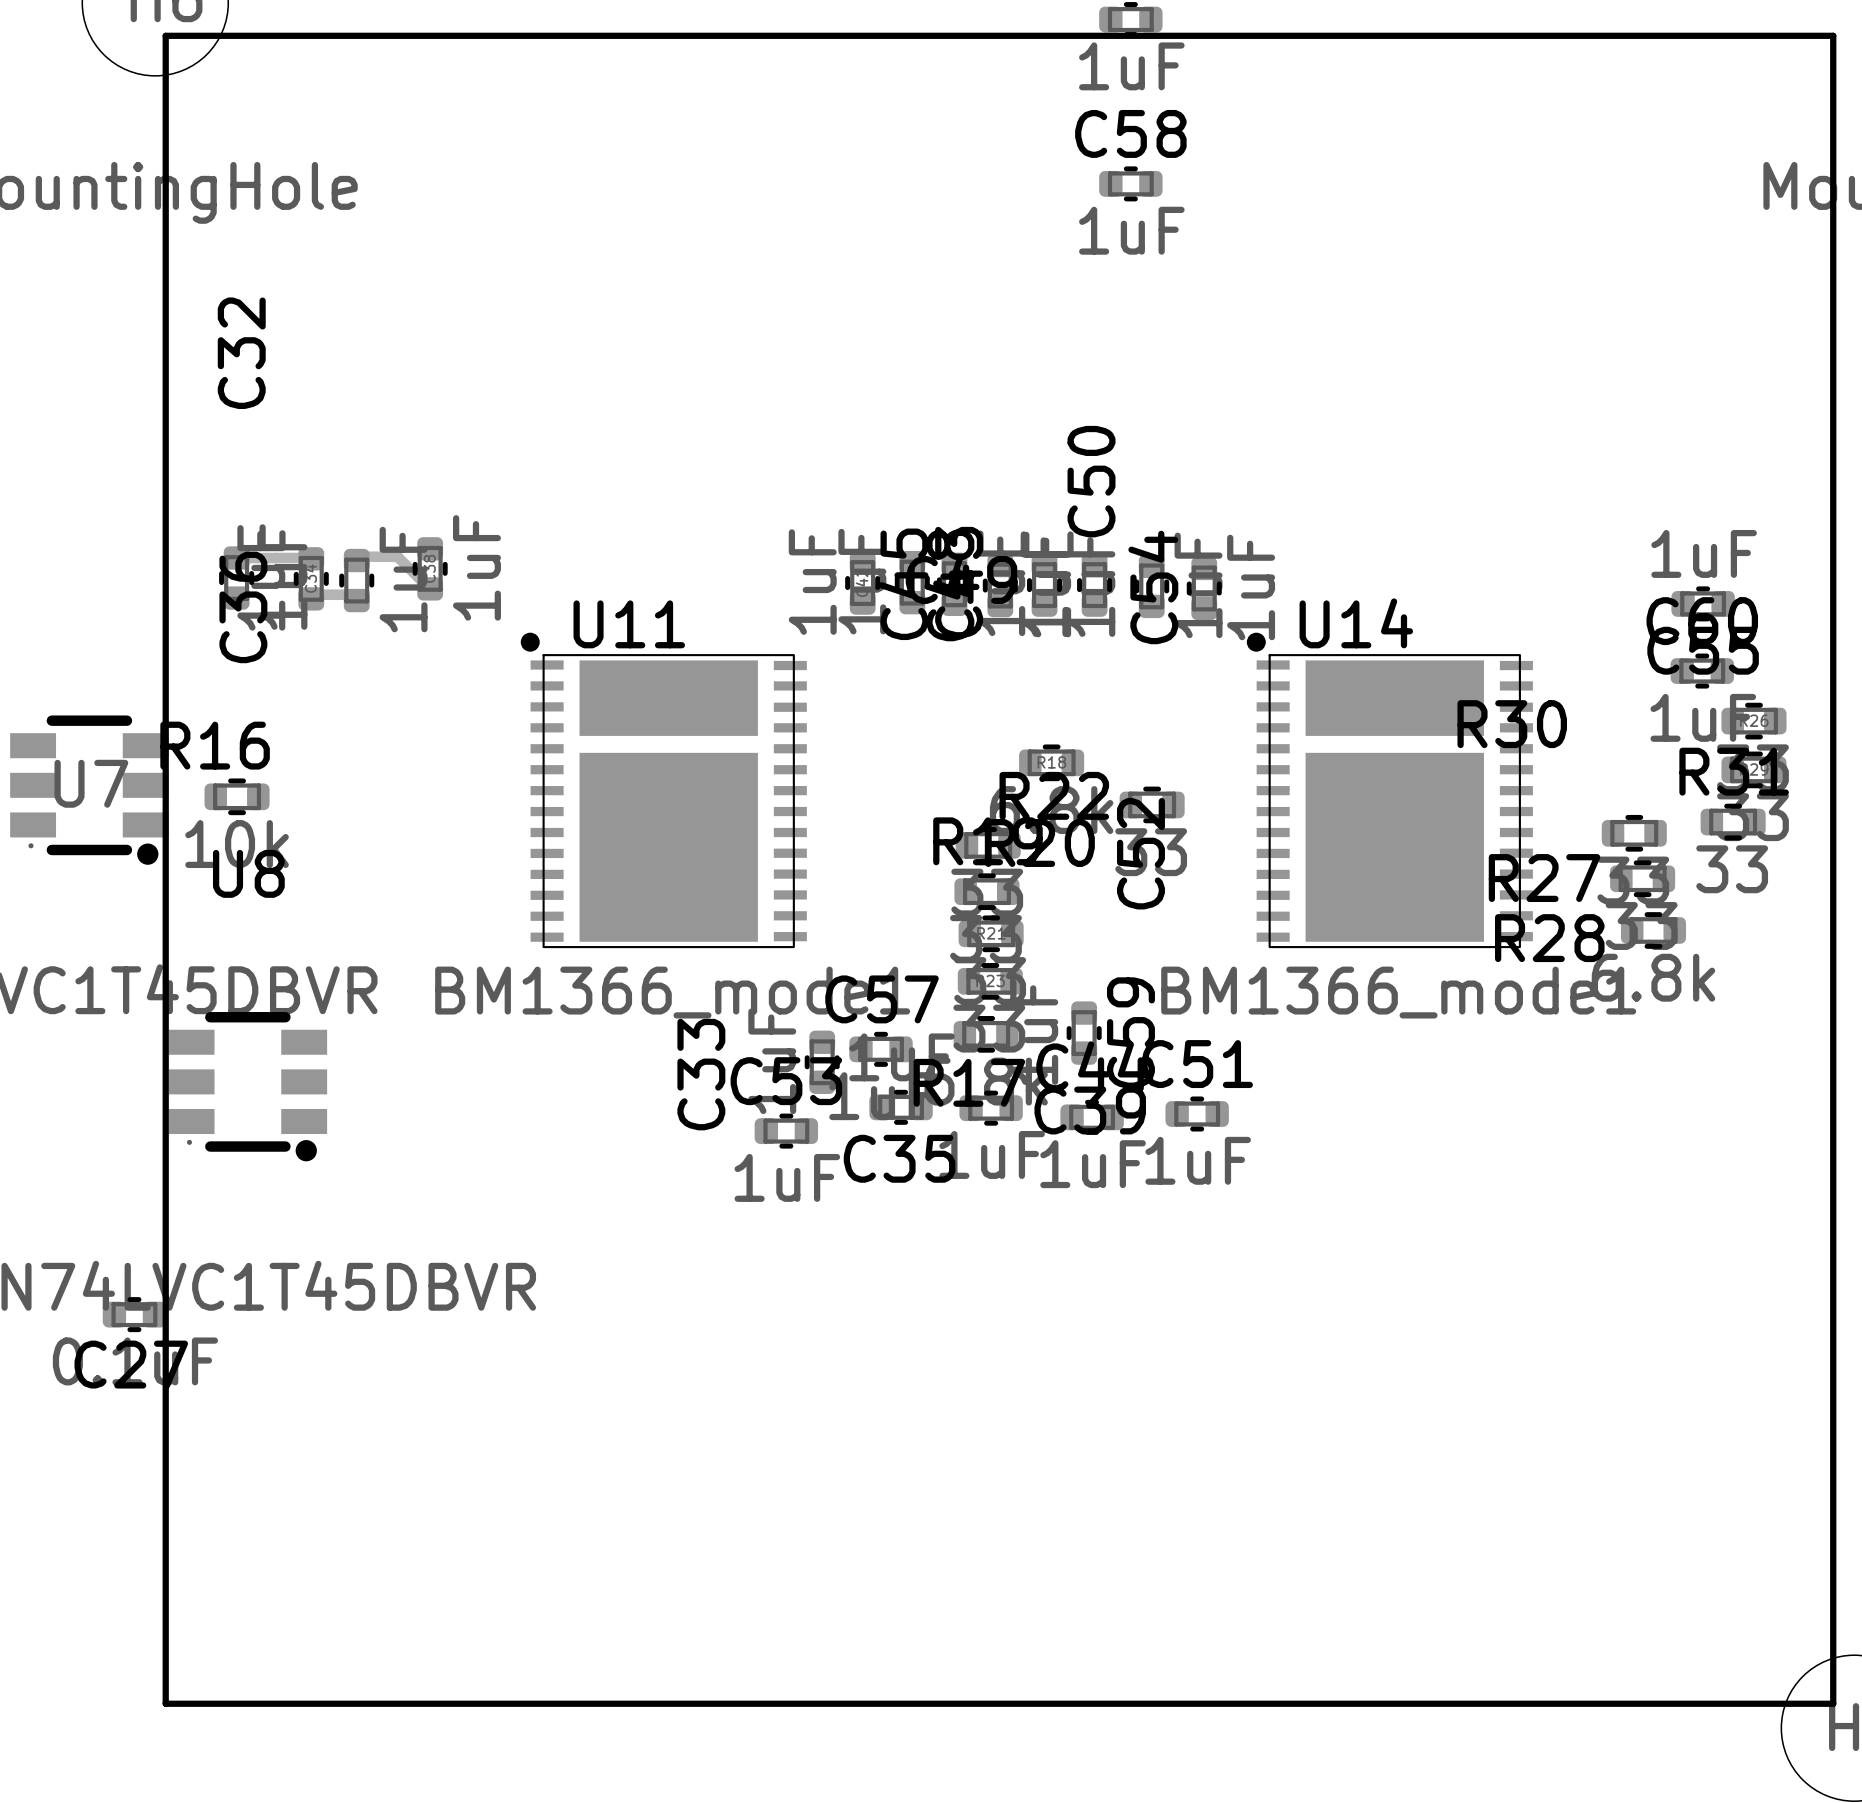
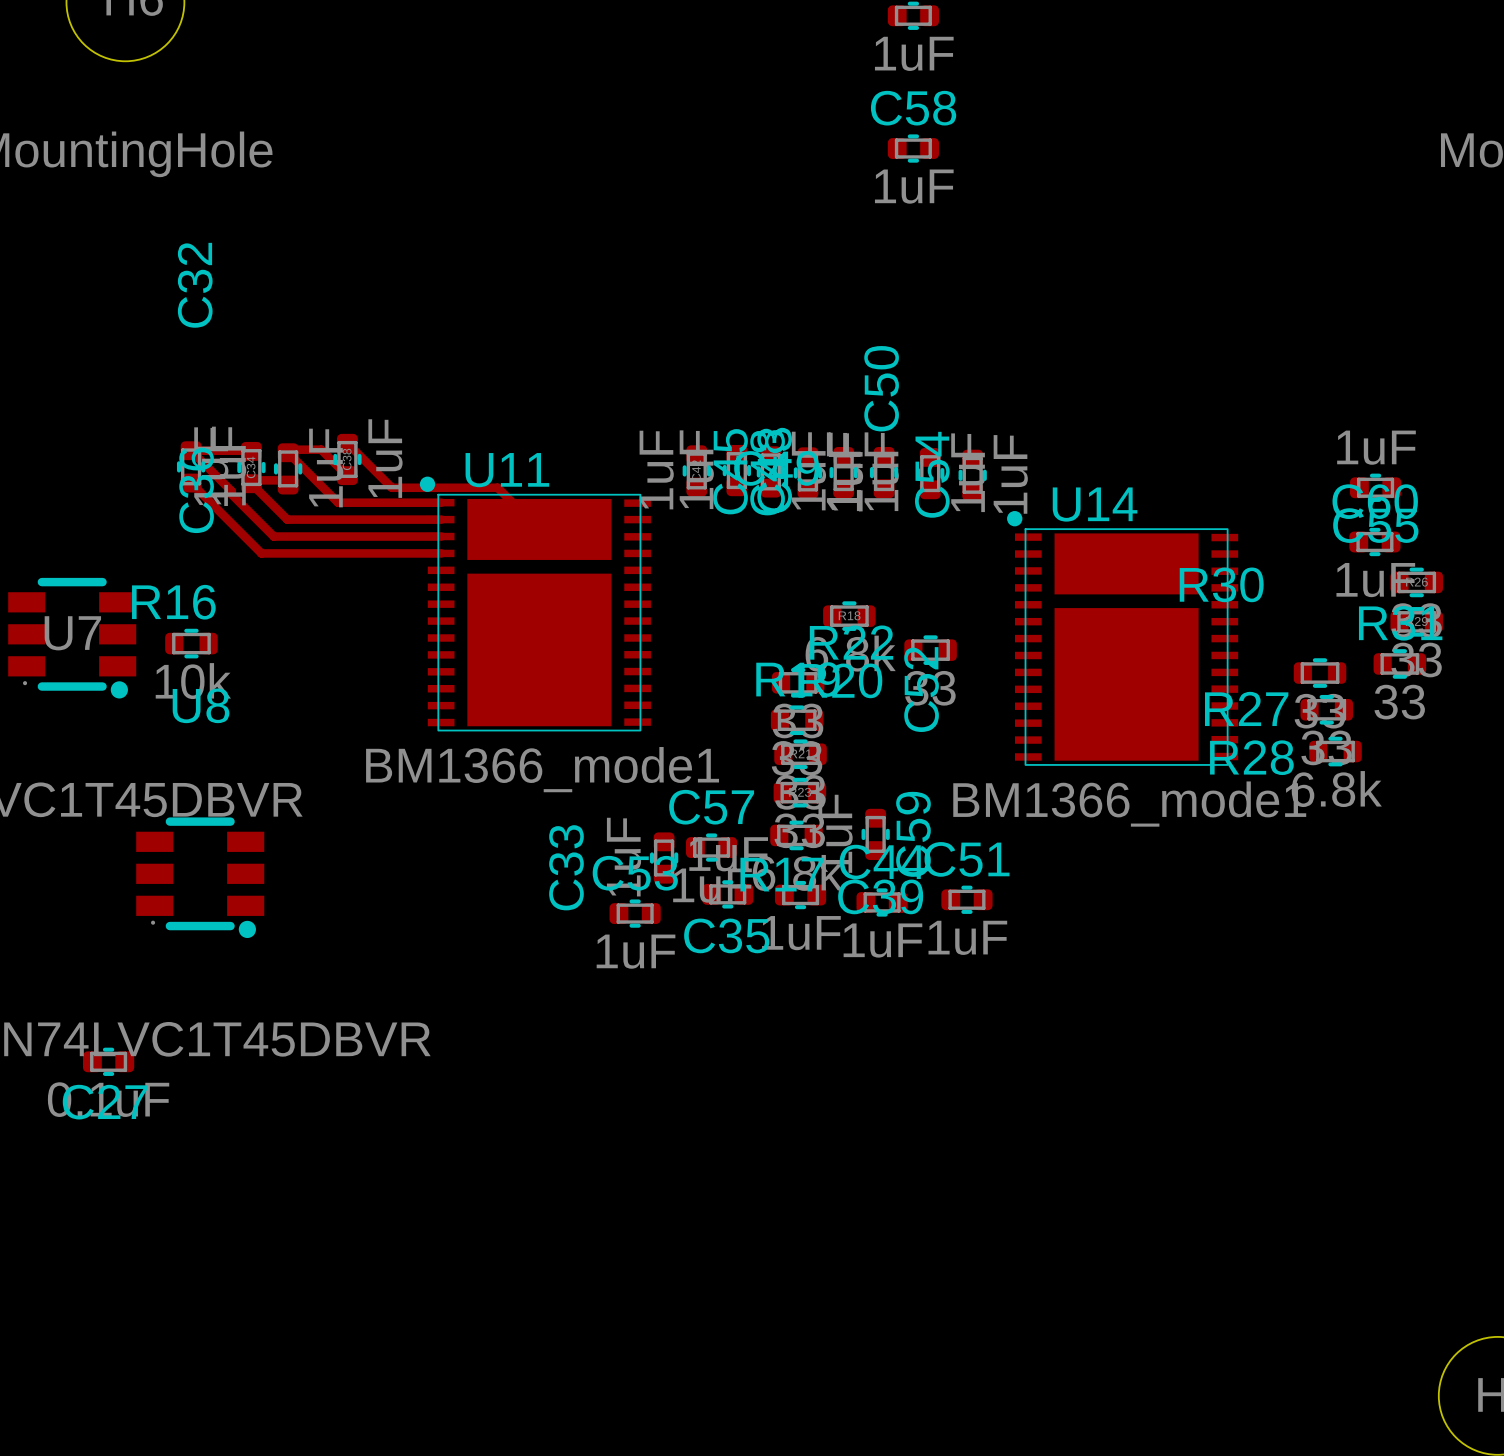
line: (165, 35) (1833, 35) (1833, 1703) (165, 1703) (165, 35) -> none
track: none -> (347, 443) (391, 487) (497, 487) (539, 529)
track: none -> (191, 450) (273, 536) (441, 536)
track: none -> (288, 452) (338, 502) (441, 502)
track: none -> (191, 483) (261, 553) (441, 553)
track: none -> (251, 483) (287, 519) (441, 519)
U11 position: (663, 790) -> (535, 603)

